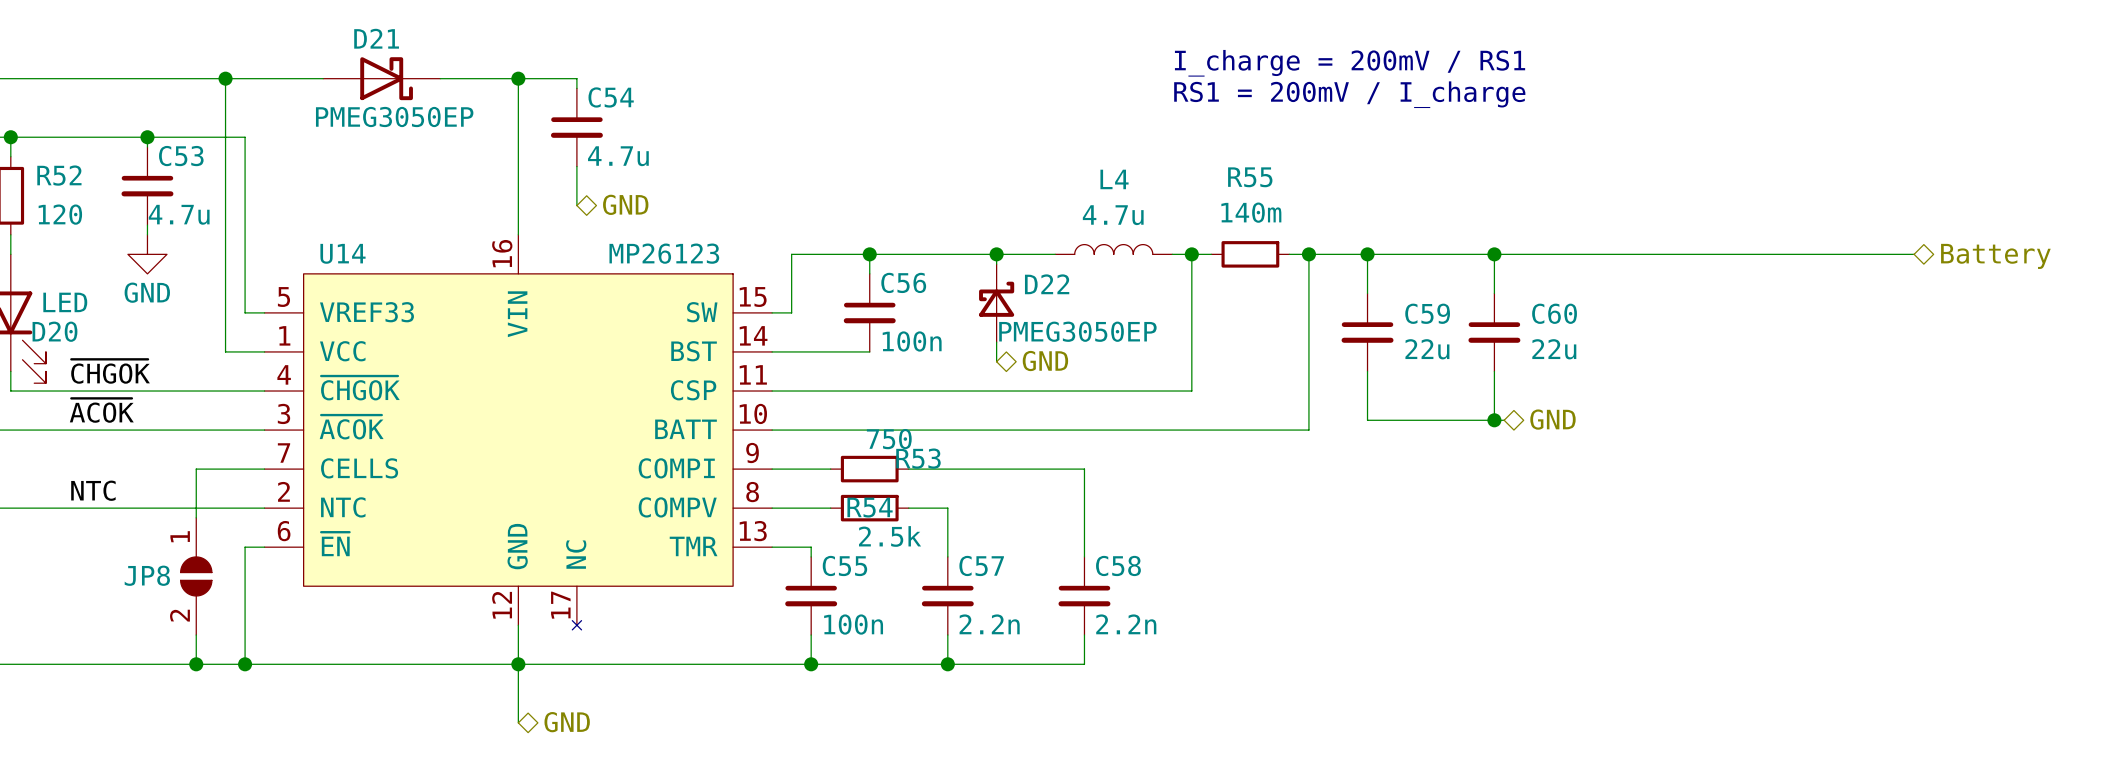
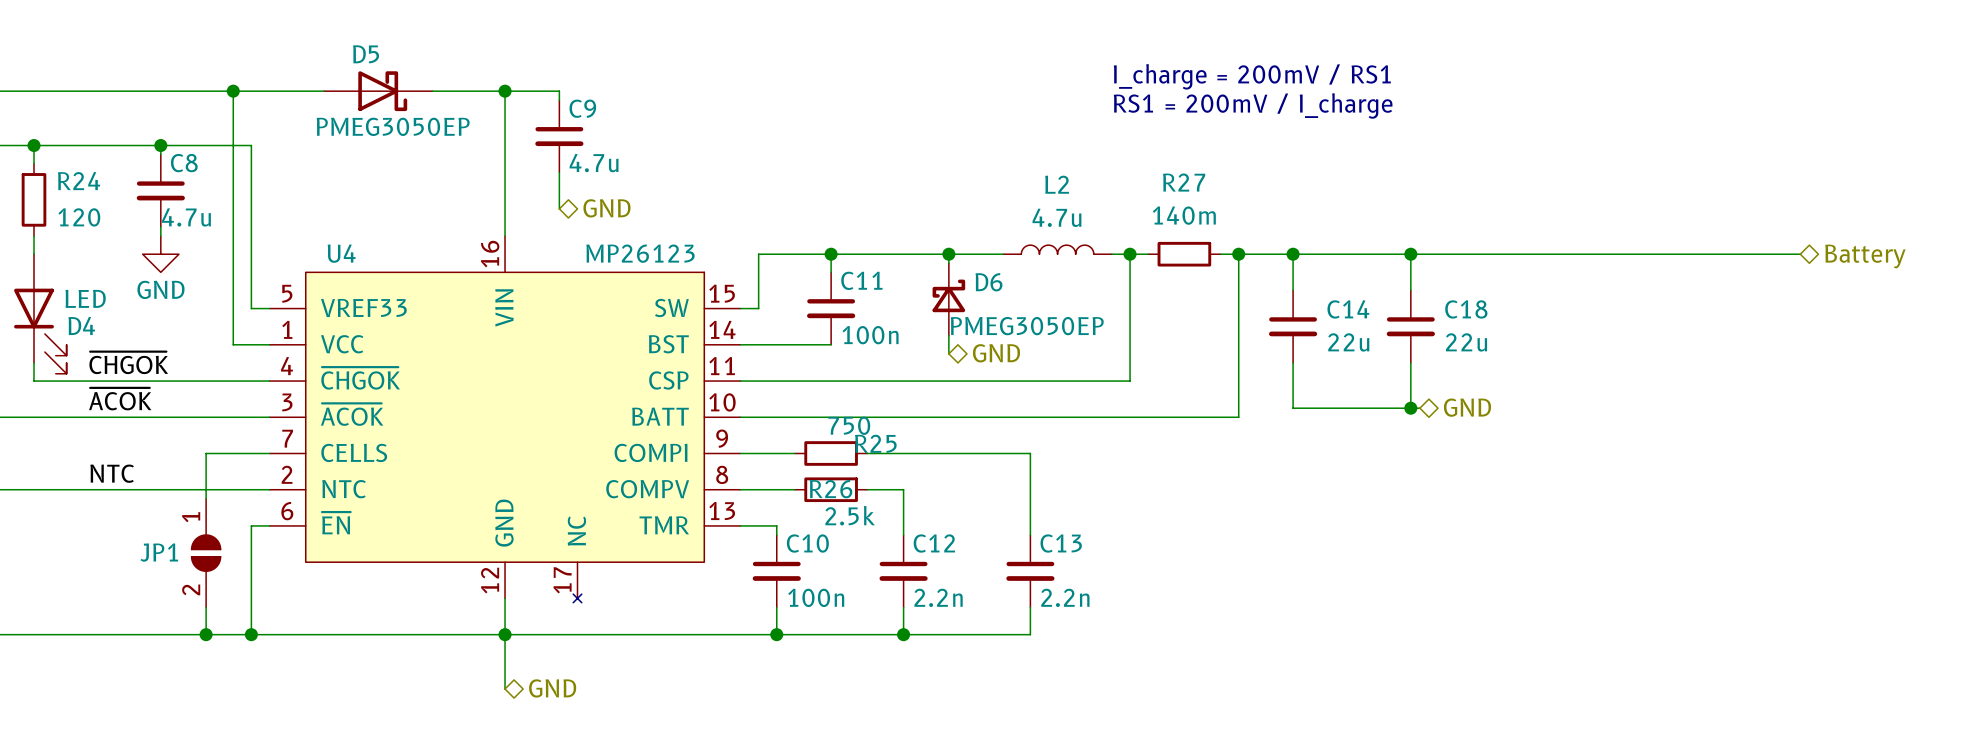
D21 name: D21 (376, 38) -> D5 (366, 54)
C54 name: C54 (611, 97) -> C9 (582, 108)
C53 name: C53 (181, 156) -> C8 (184, 163)
R52 name: R52 (59, 175) -> R24 (79, 181)
R55 name: R55 (1250, 177) -> R27 (1184, 182)
L4 name: L4 (1114, 179) -> L2 (1057, 184)
C56 name: C56 (903, 282) -> C11 (861, 280)
D22 name: D22 (1047, 284) -> D6 (988, 282)
C59 name: C59 (1427, 313) -> C14 (1348, 309)
C60 name: C60 (1554, 313) -> C18 (1466, 309)
D20 name: D20 (54, 331) -> D4 (81, 326)
U14: MP26123 (518, 432) -> none
U4: none -> MP26123 (505, 419)
R53 name: R53 (918, 458) -> R25 (875, 443)
R54 name: R54 (870, 507) -> R26 (831, 489)
C55 name: C55 (844, 565) -> C10 (807, 543)
C57 name: C57 (981, 565) -> C12 (934, 543)
C58 name: C58 (1118, 565) -> C13 (1061, 543)
JP8 name: JP8 (147, 575) -> JP1 (159, 552)

